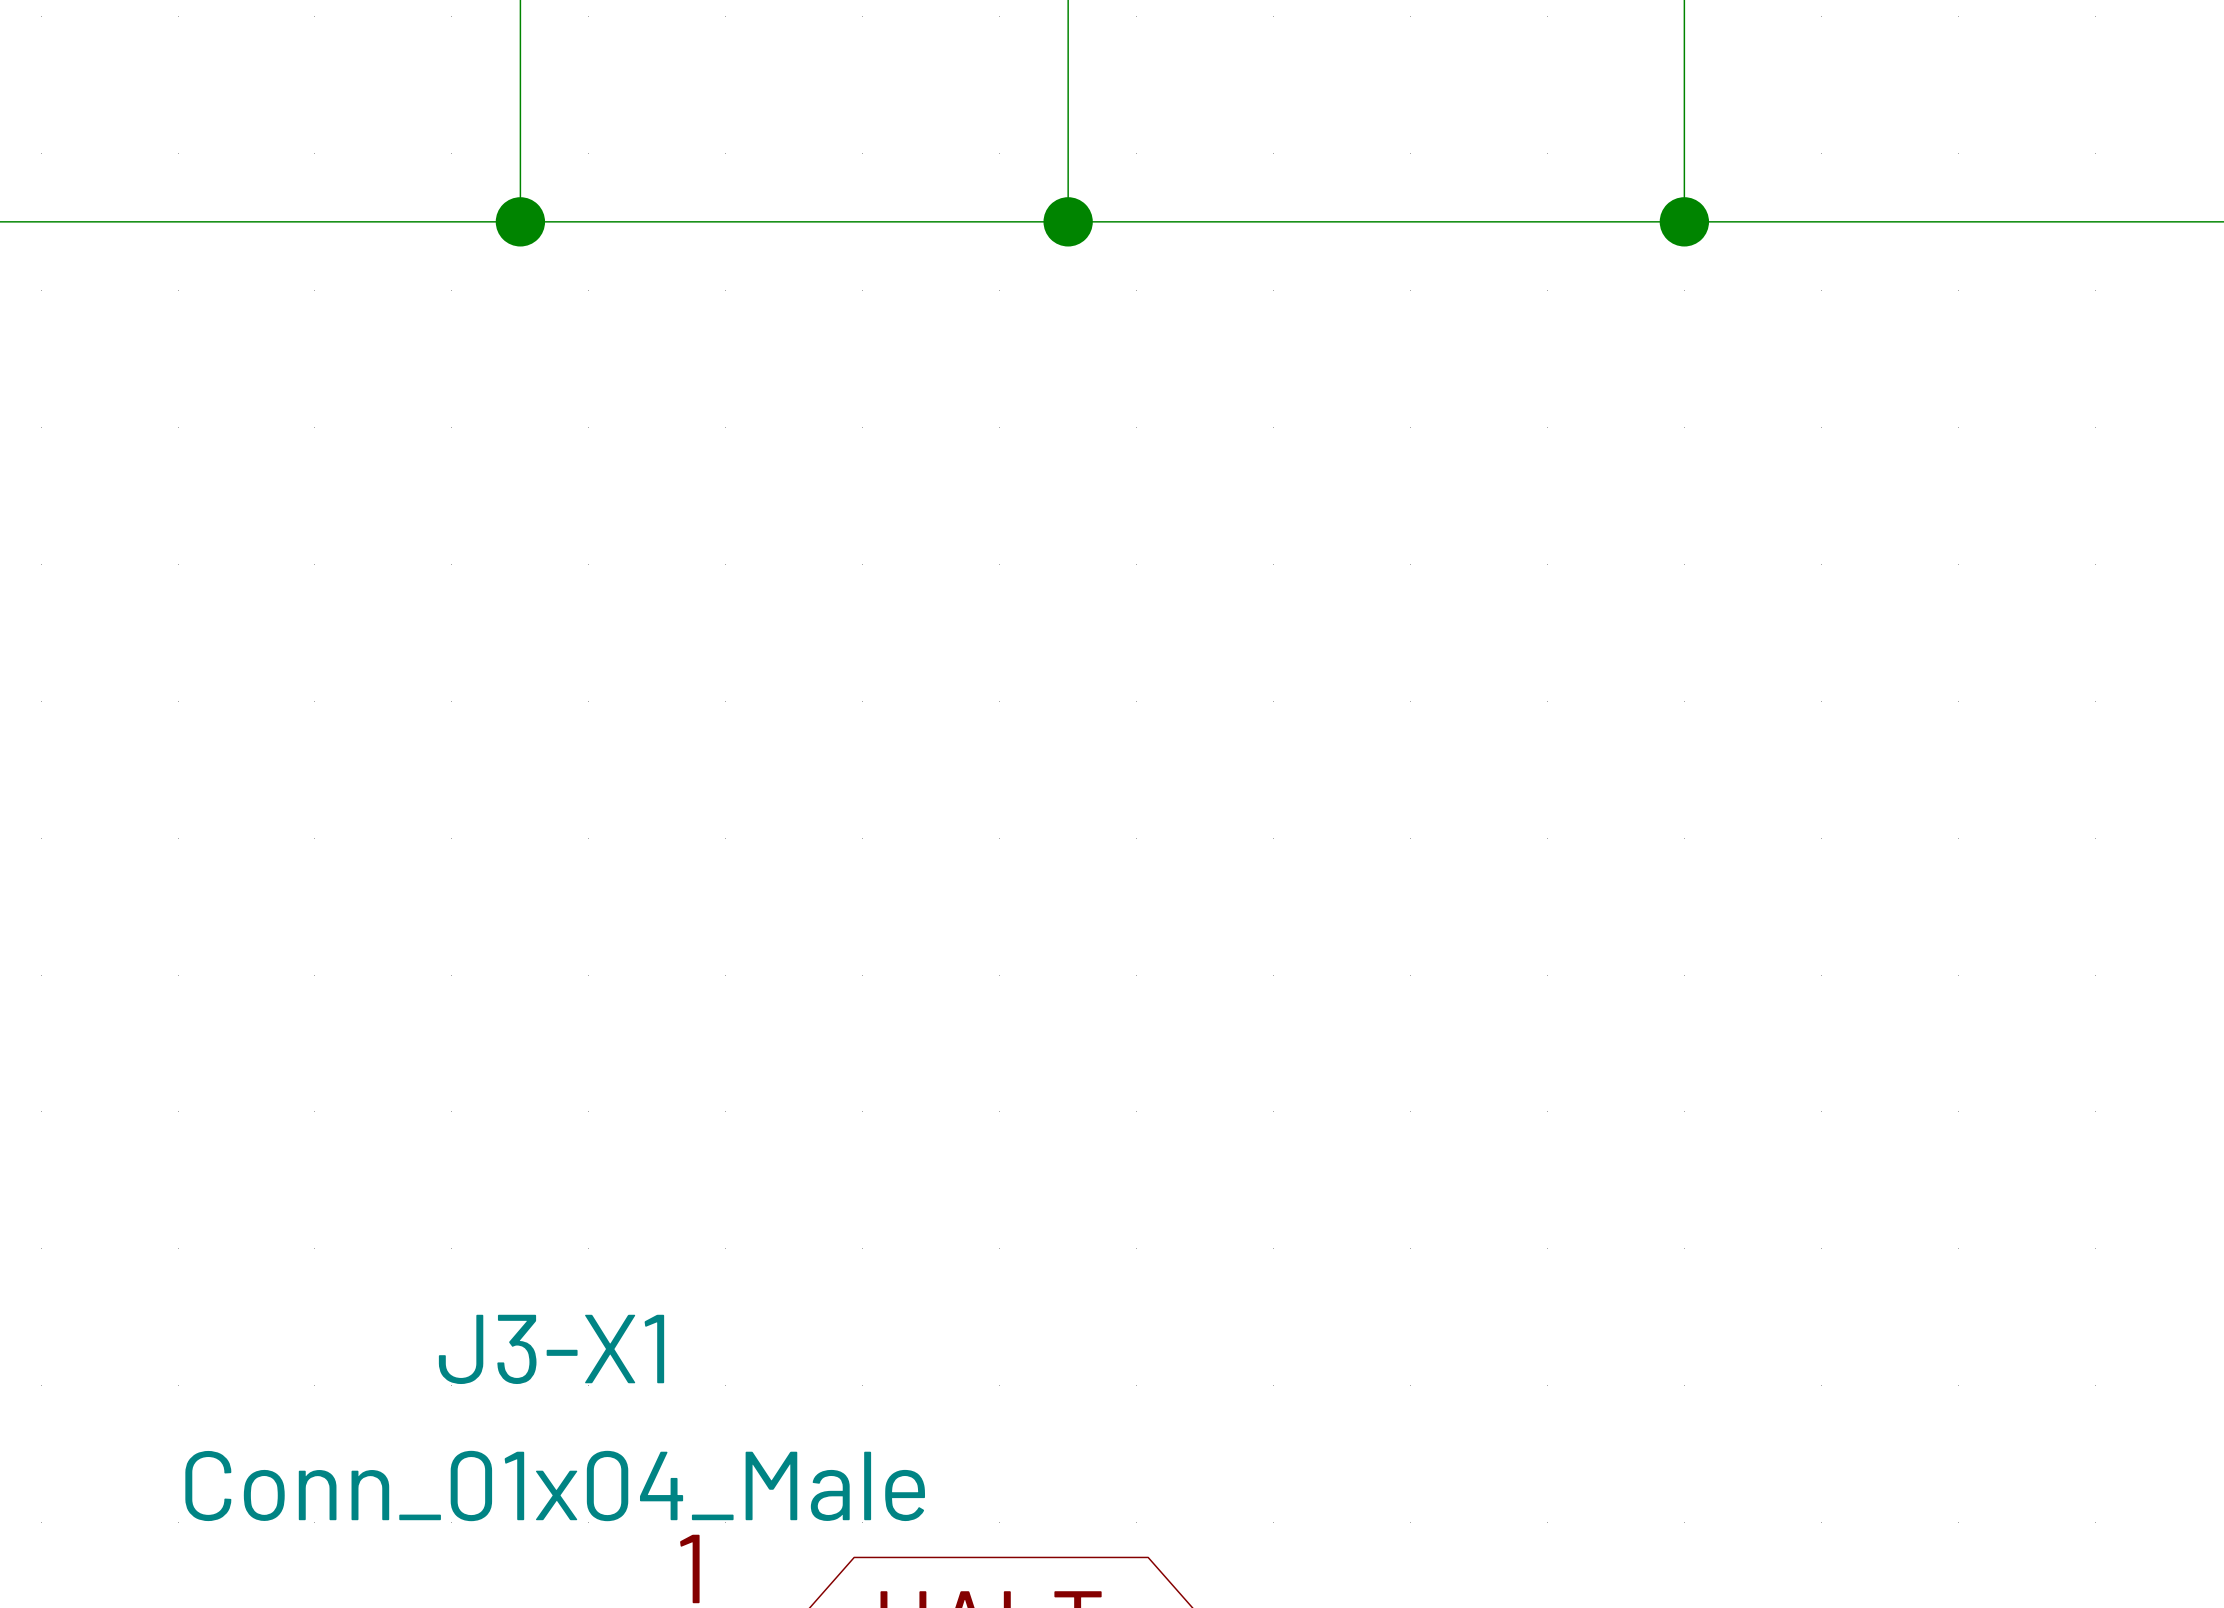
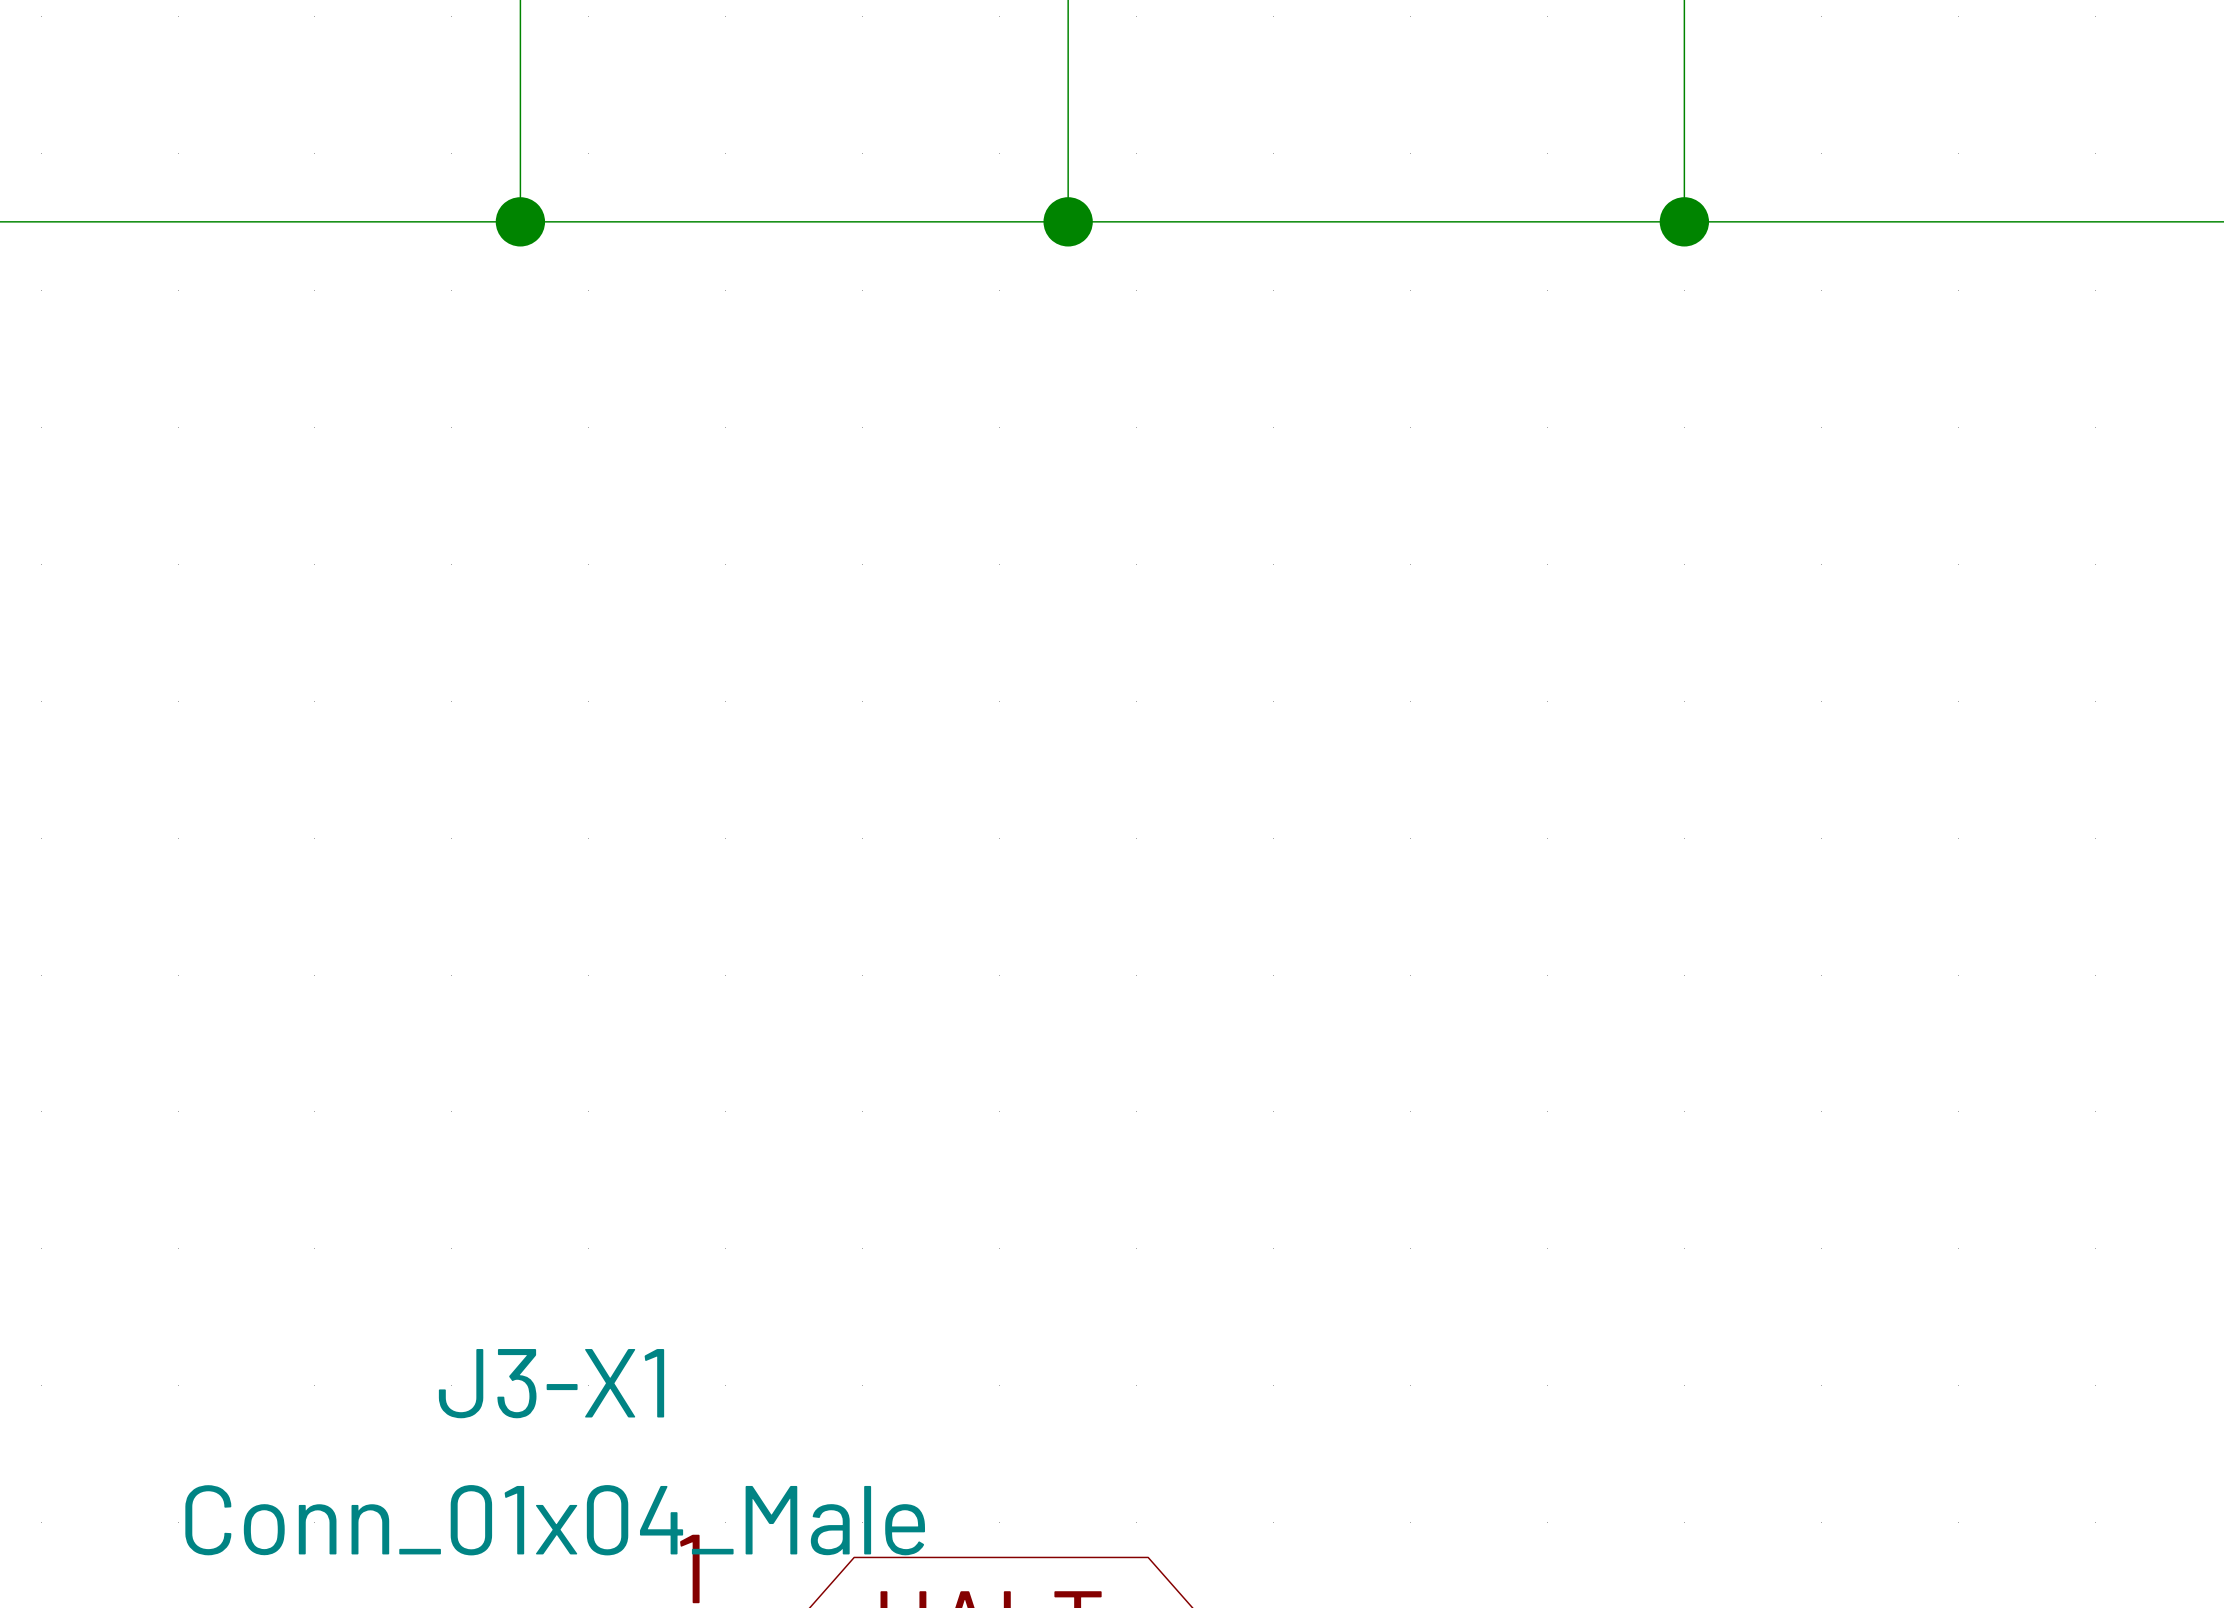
J3-X1 name position: J3-X1 (551, 1349) -> J3-X1 (551, 1383)
J3-X1 value position: Conn_01x04_Male (555, 1486) -> Conn_01x04_Male (555, 1520)

